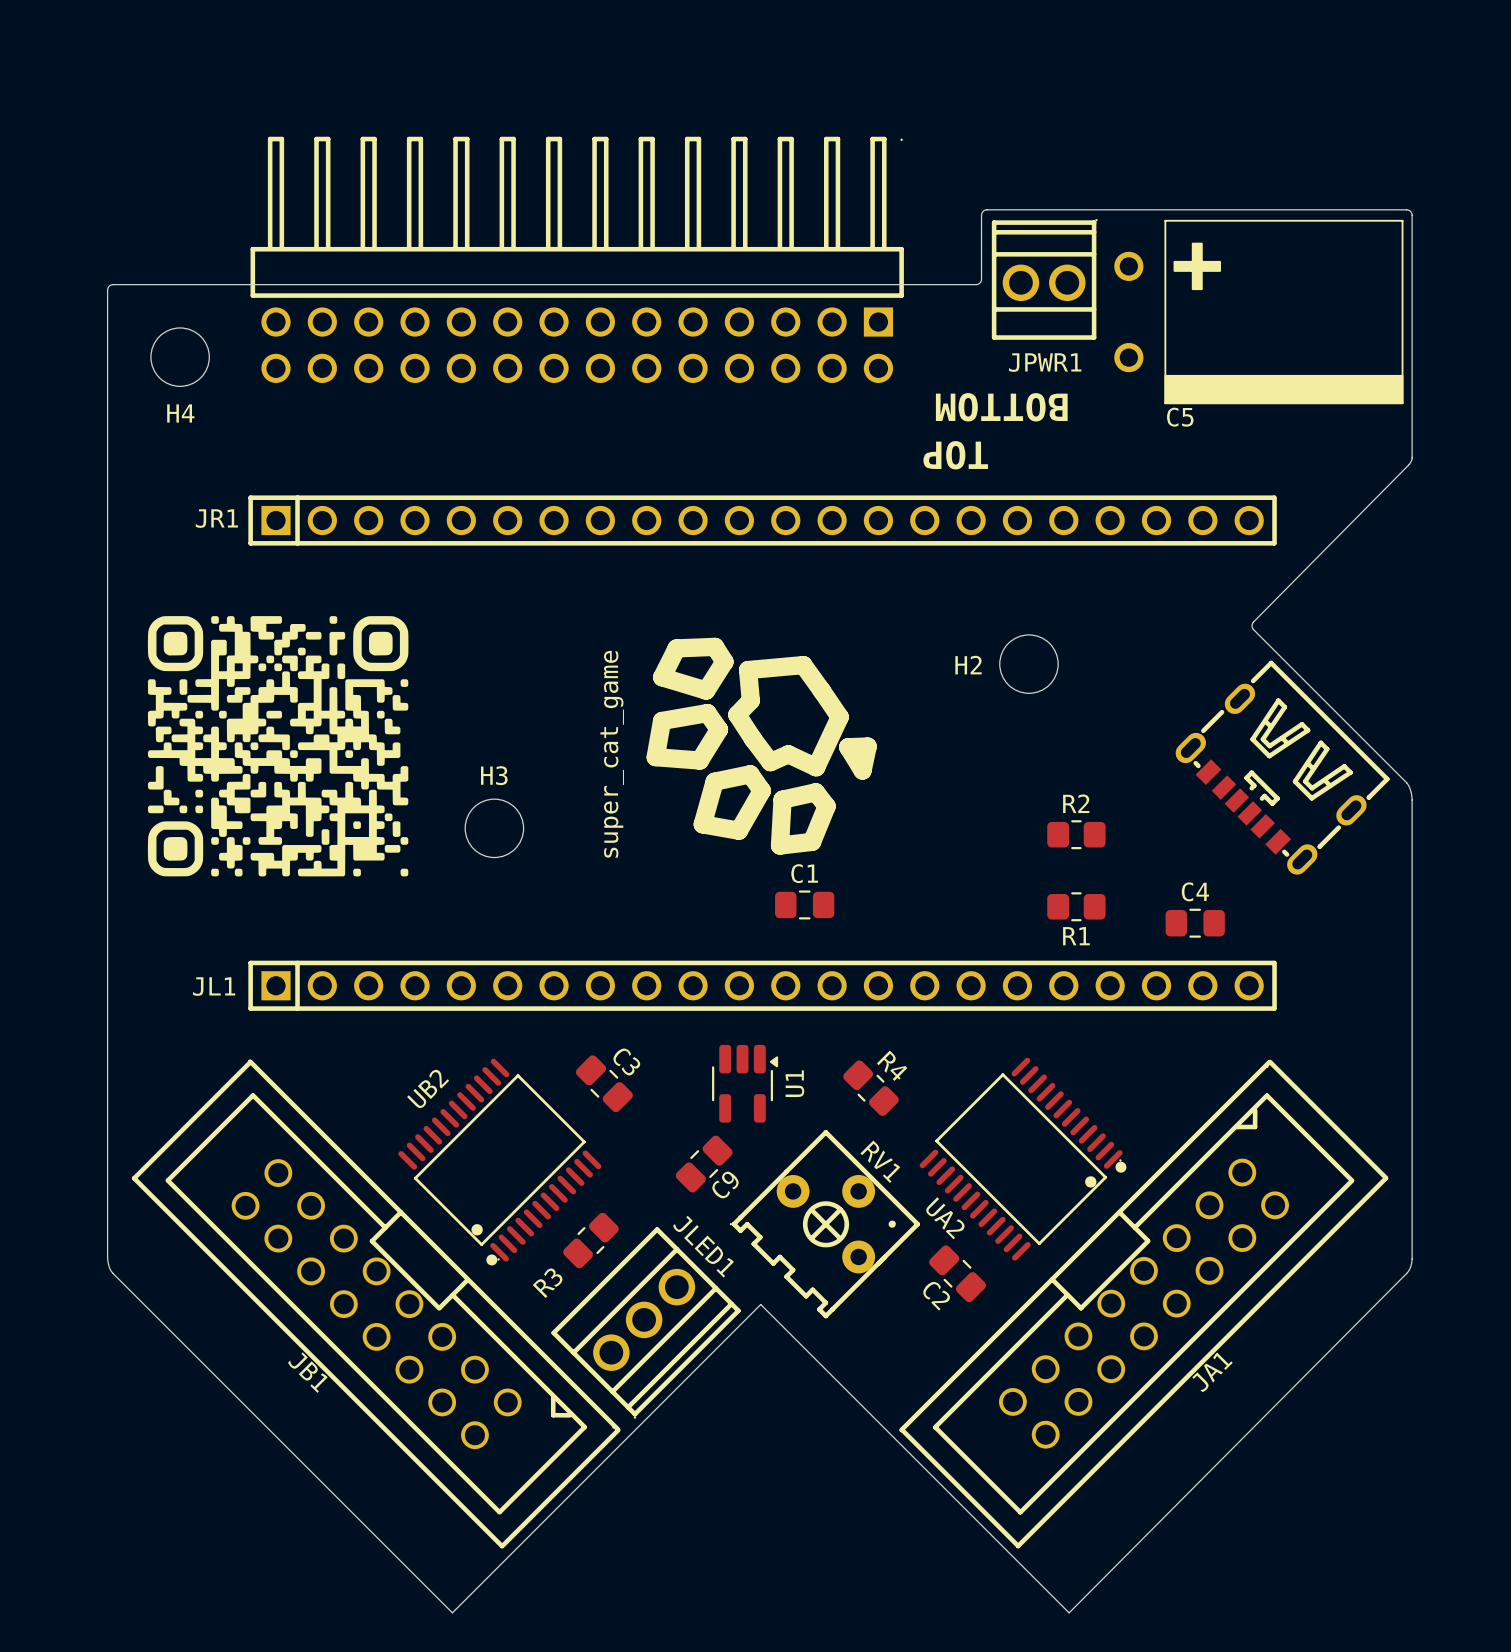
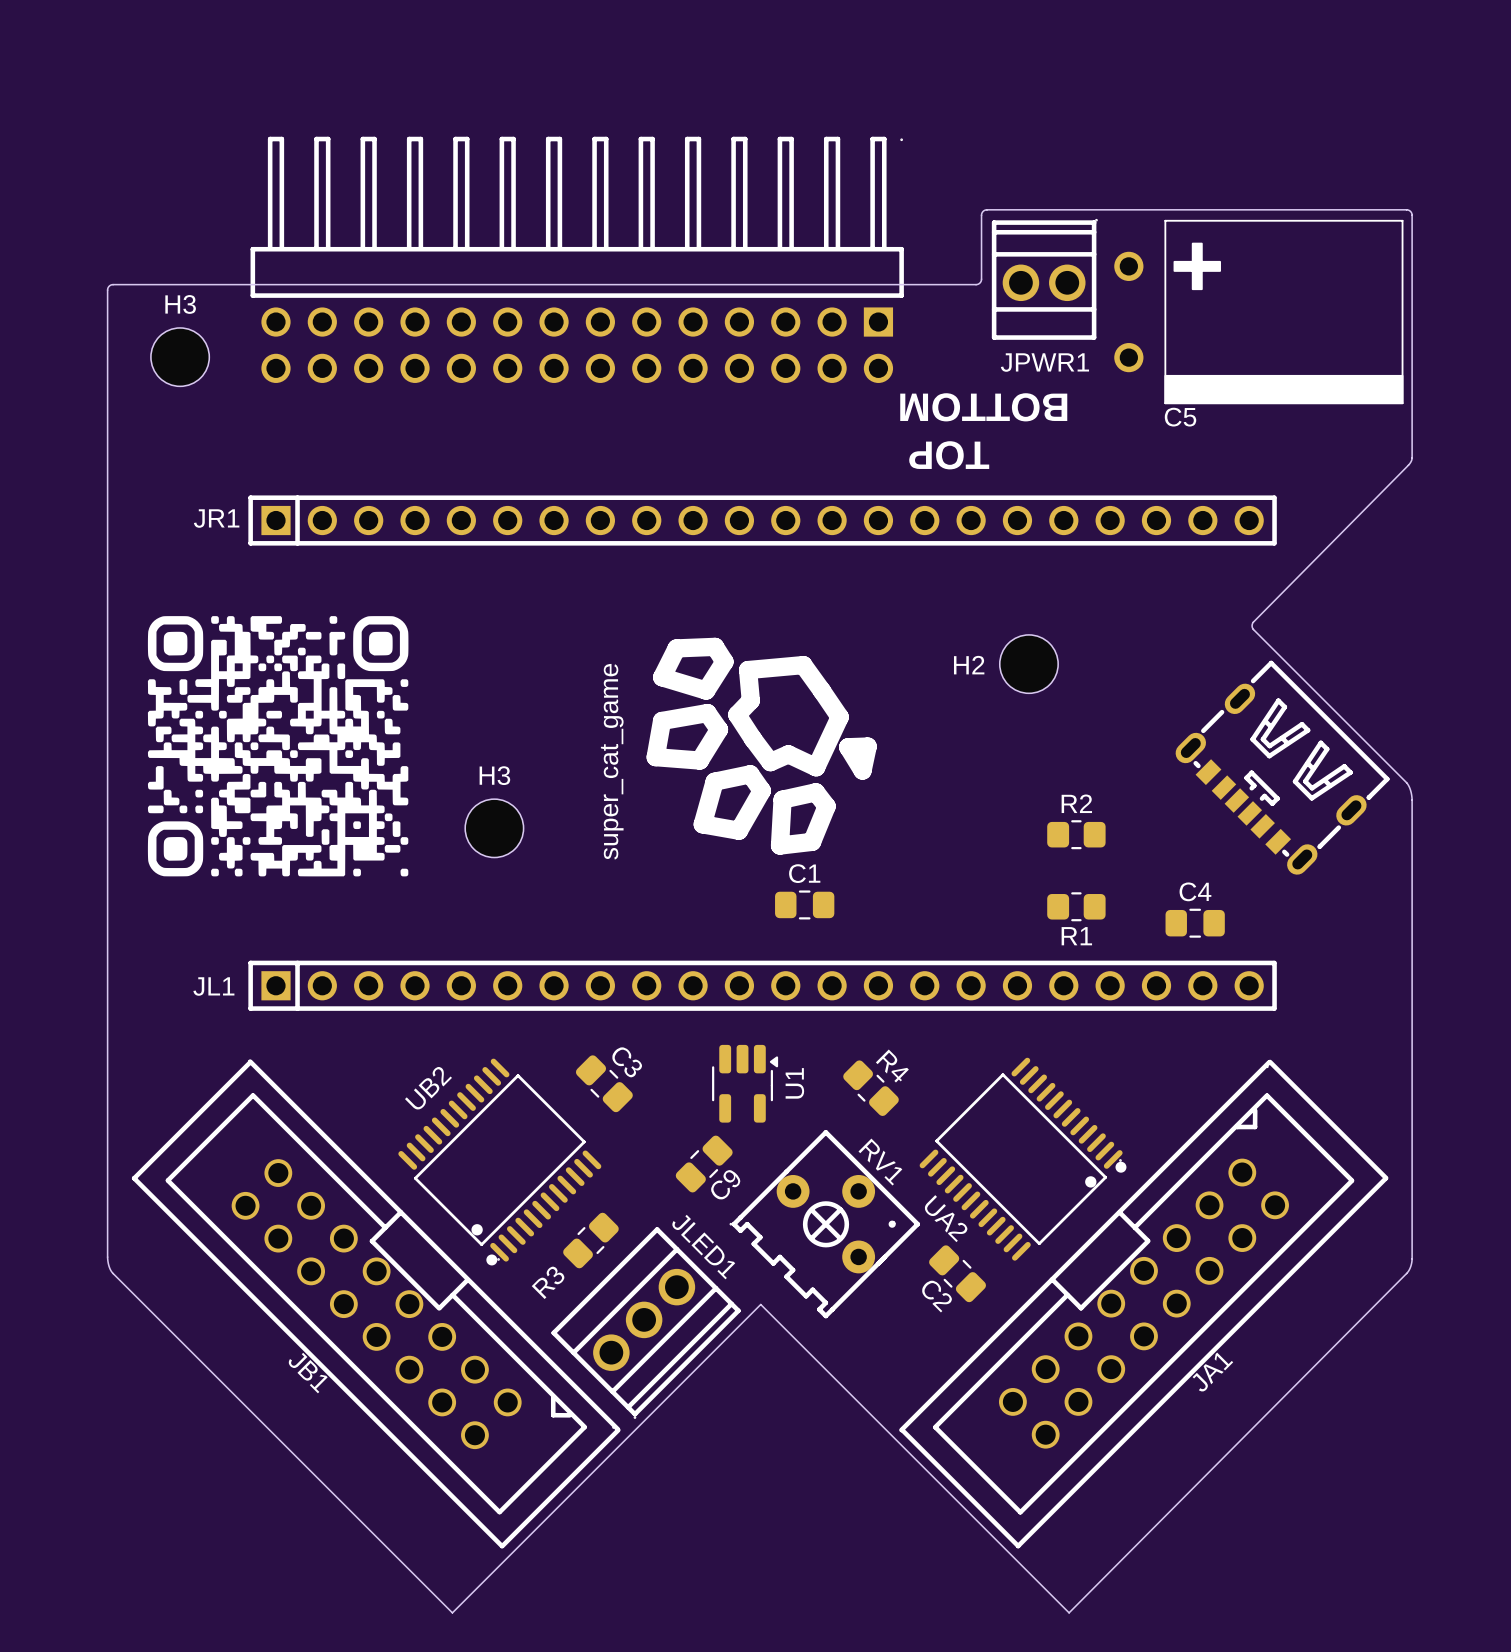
H4 name: H4 (180, 413) -> H3 (180, 304)

